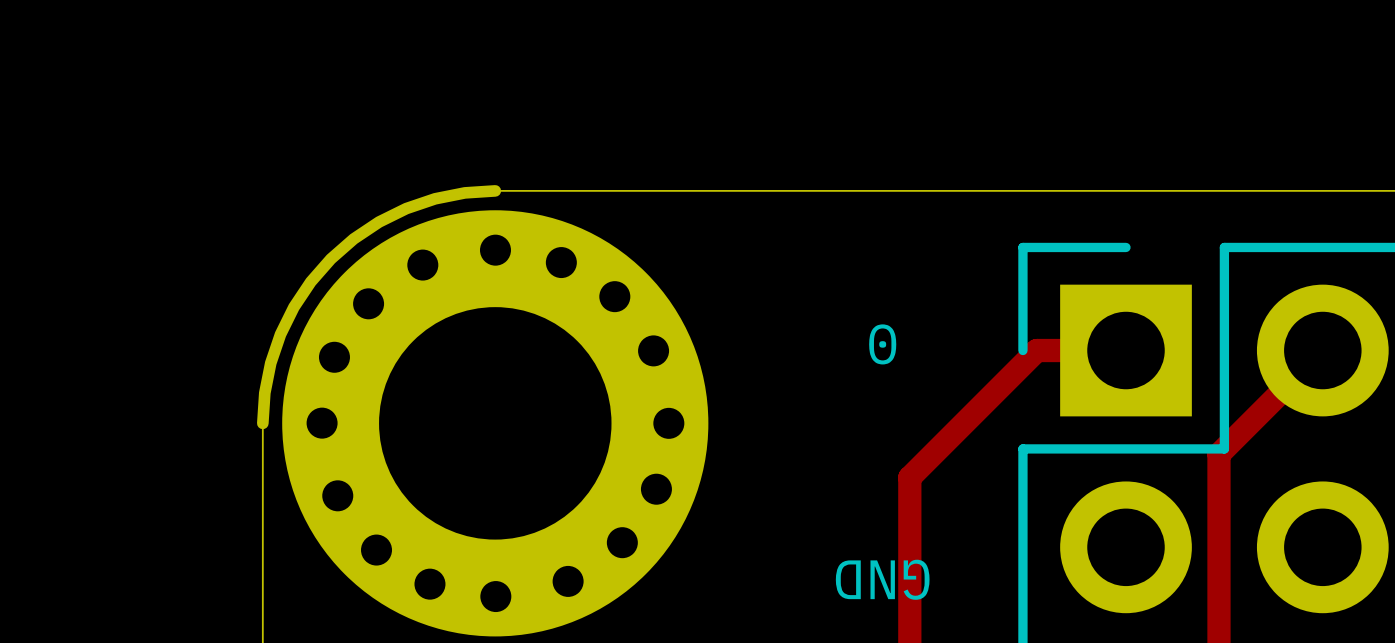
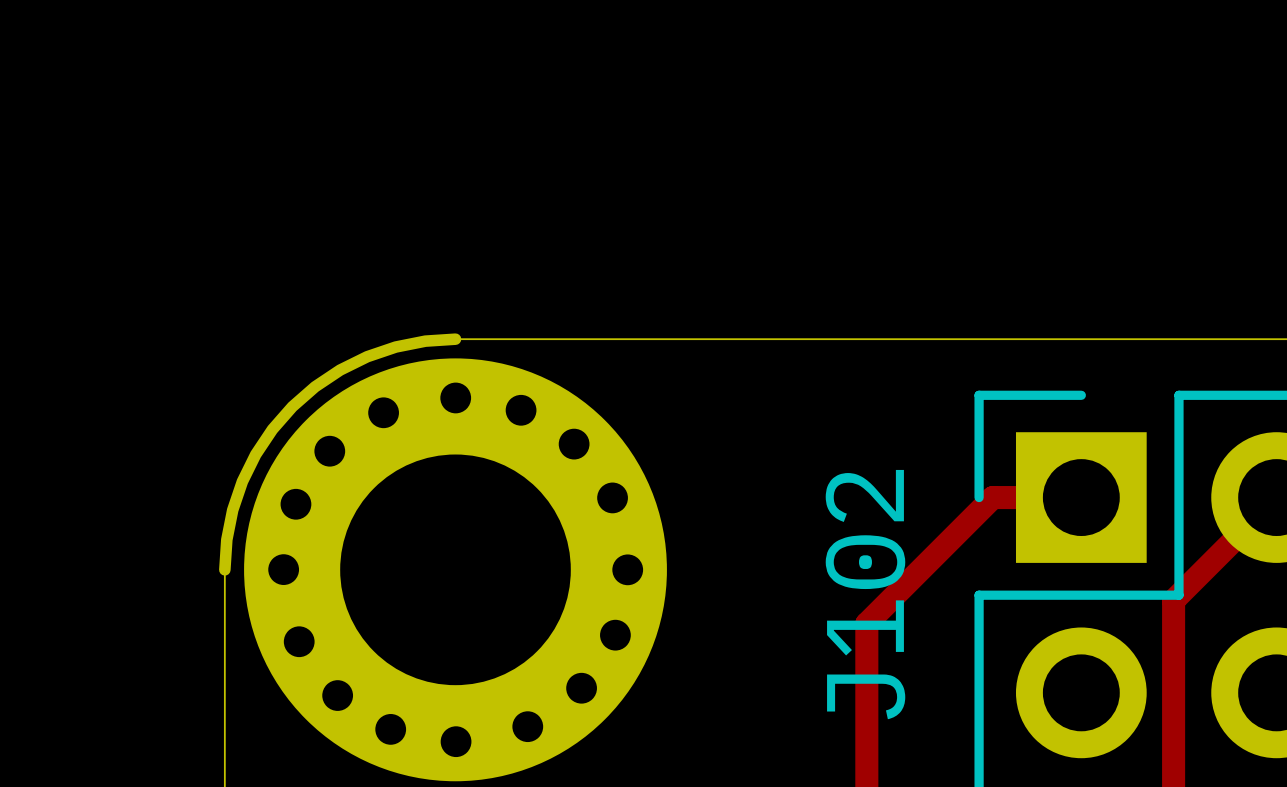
text: 0 (882, 344) -> none
J102 name: none -> J102 (865, 594)
text: GND (882, 579) -> none

